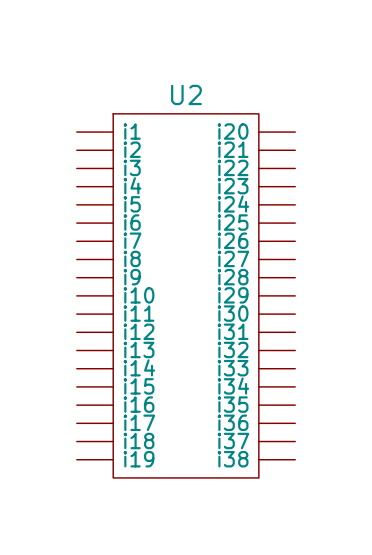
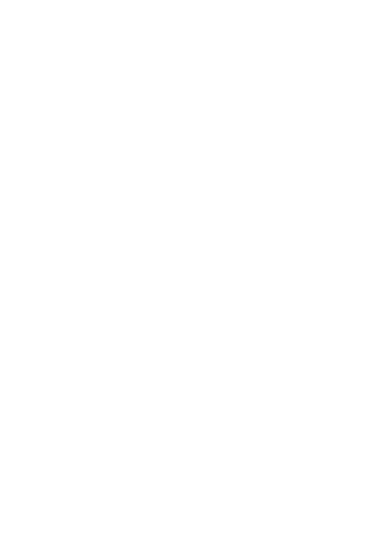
U2: (186, 295) -> none

